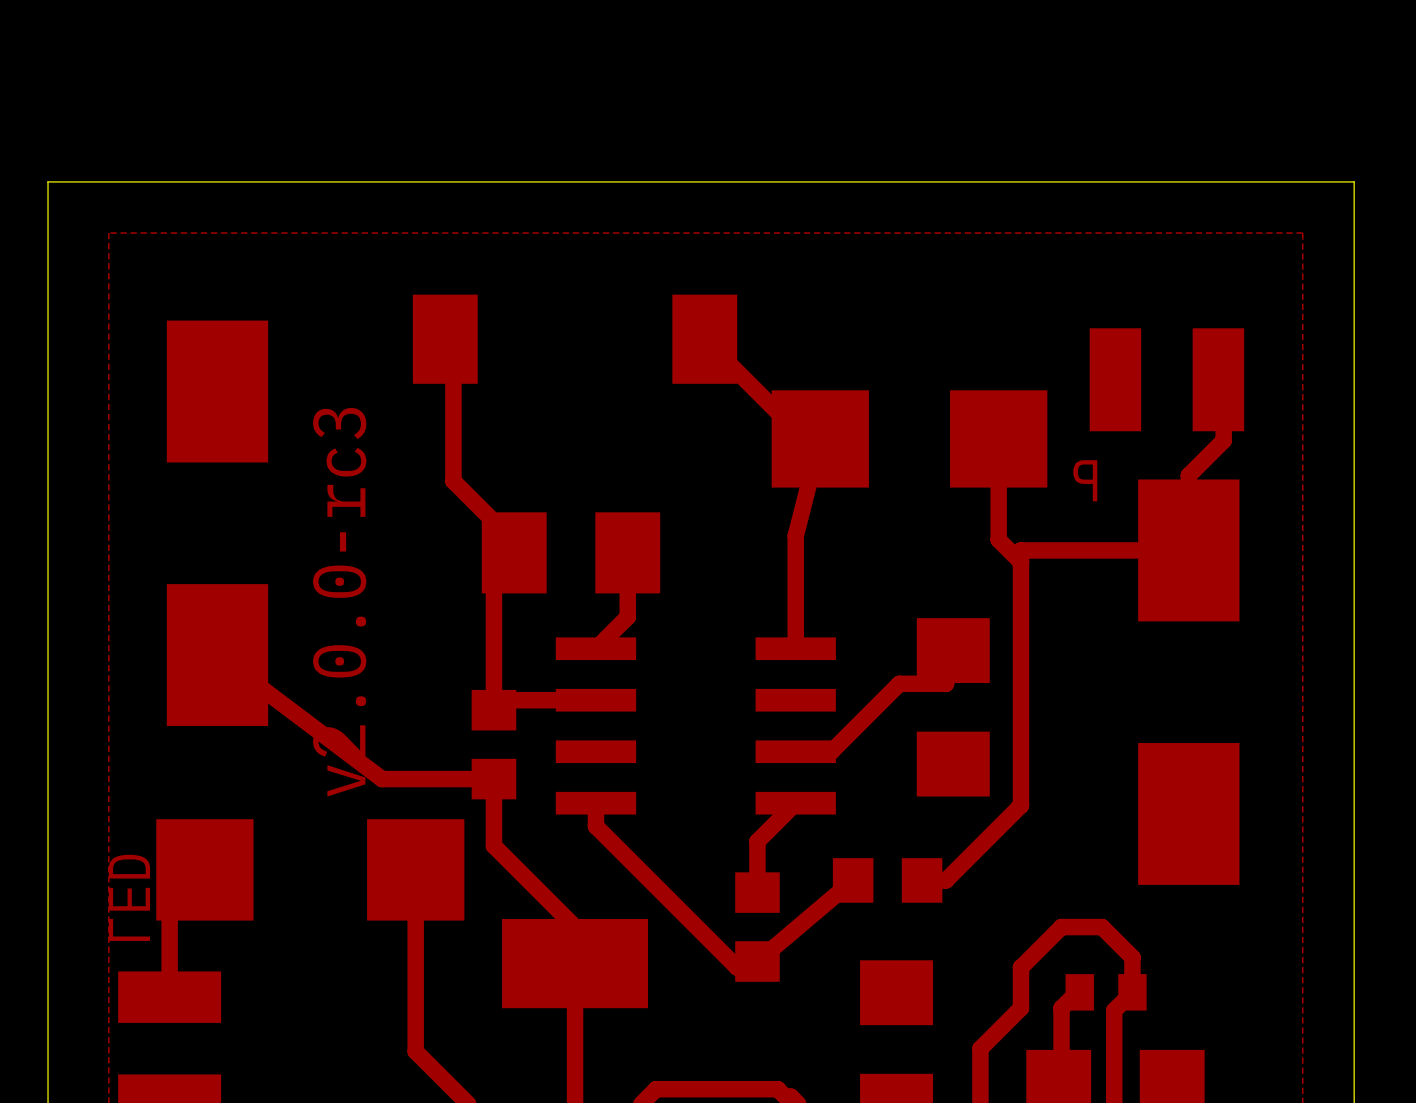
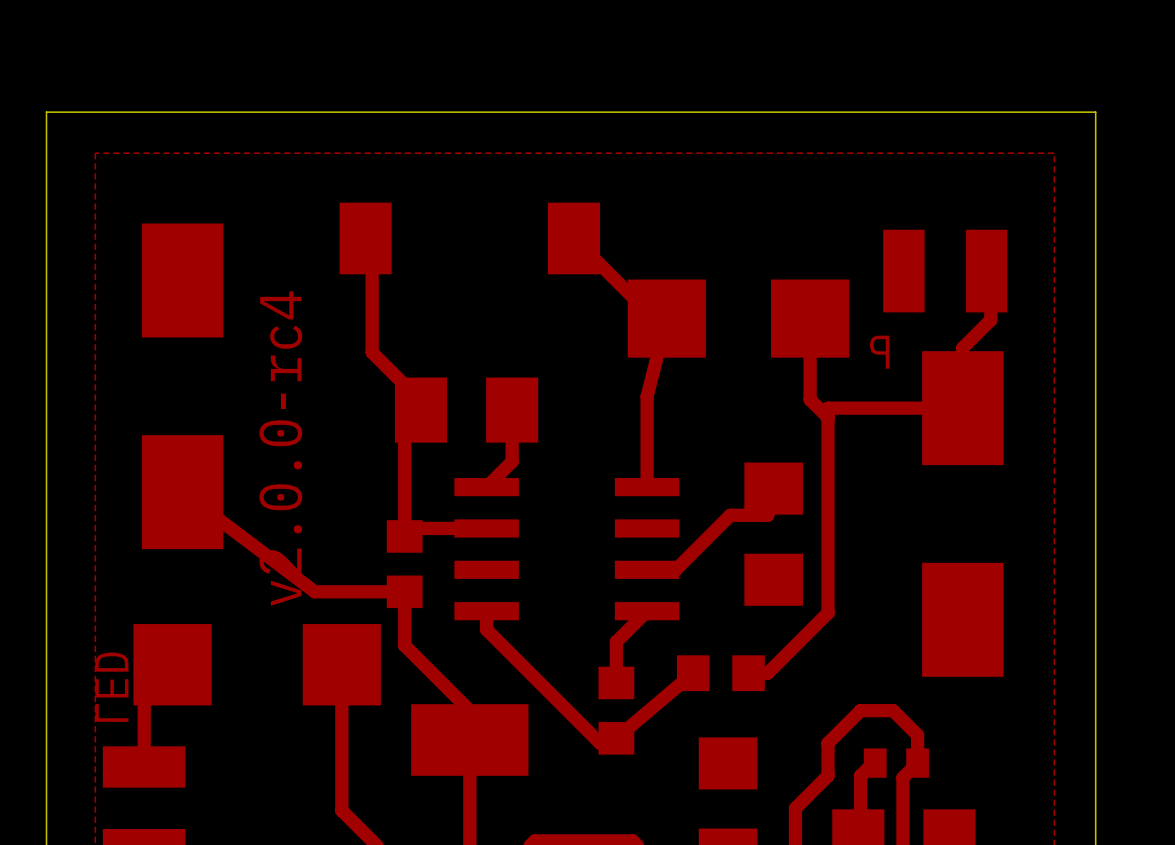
text: v2.0.0-rc3 (339, 602) -> v2.0.0-rc4 (280, 448)

